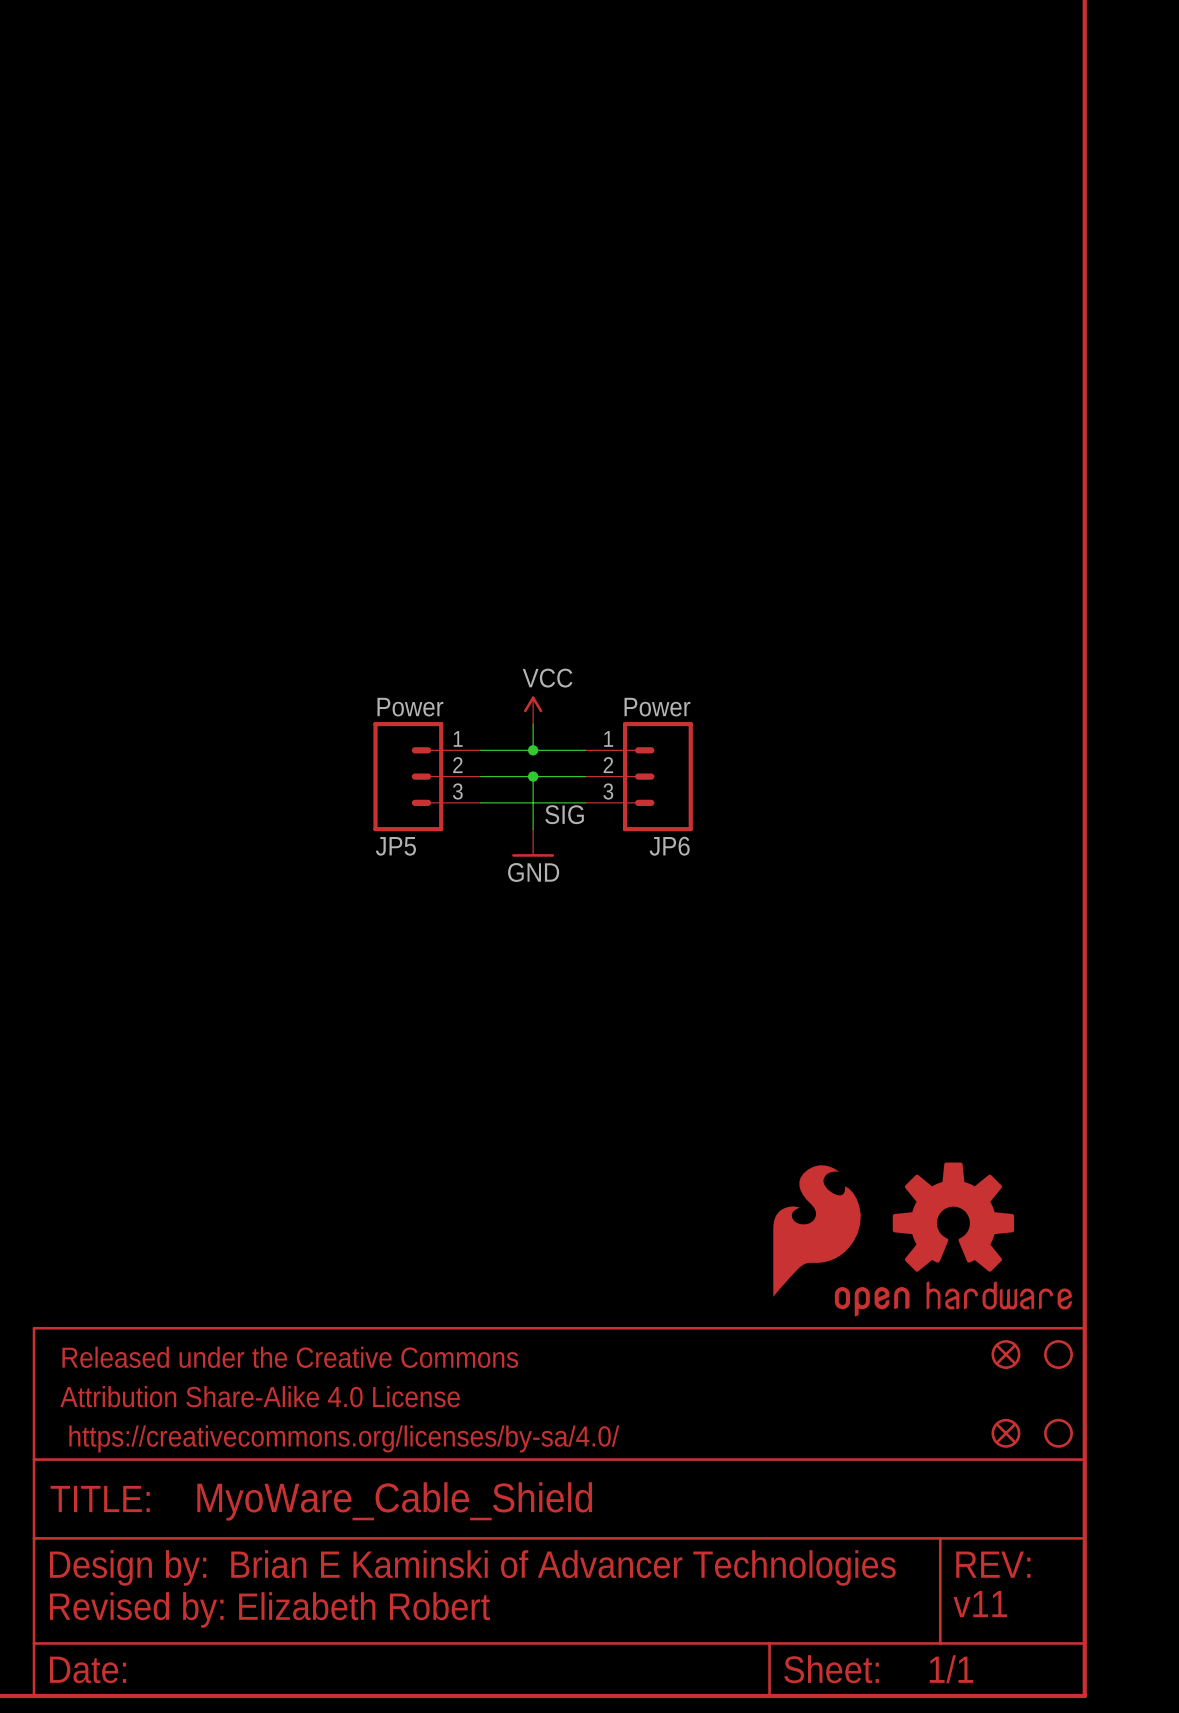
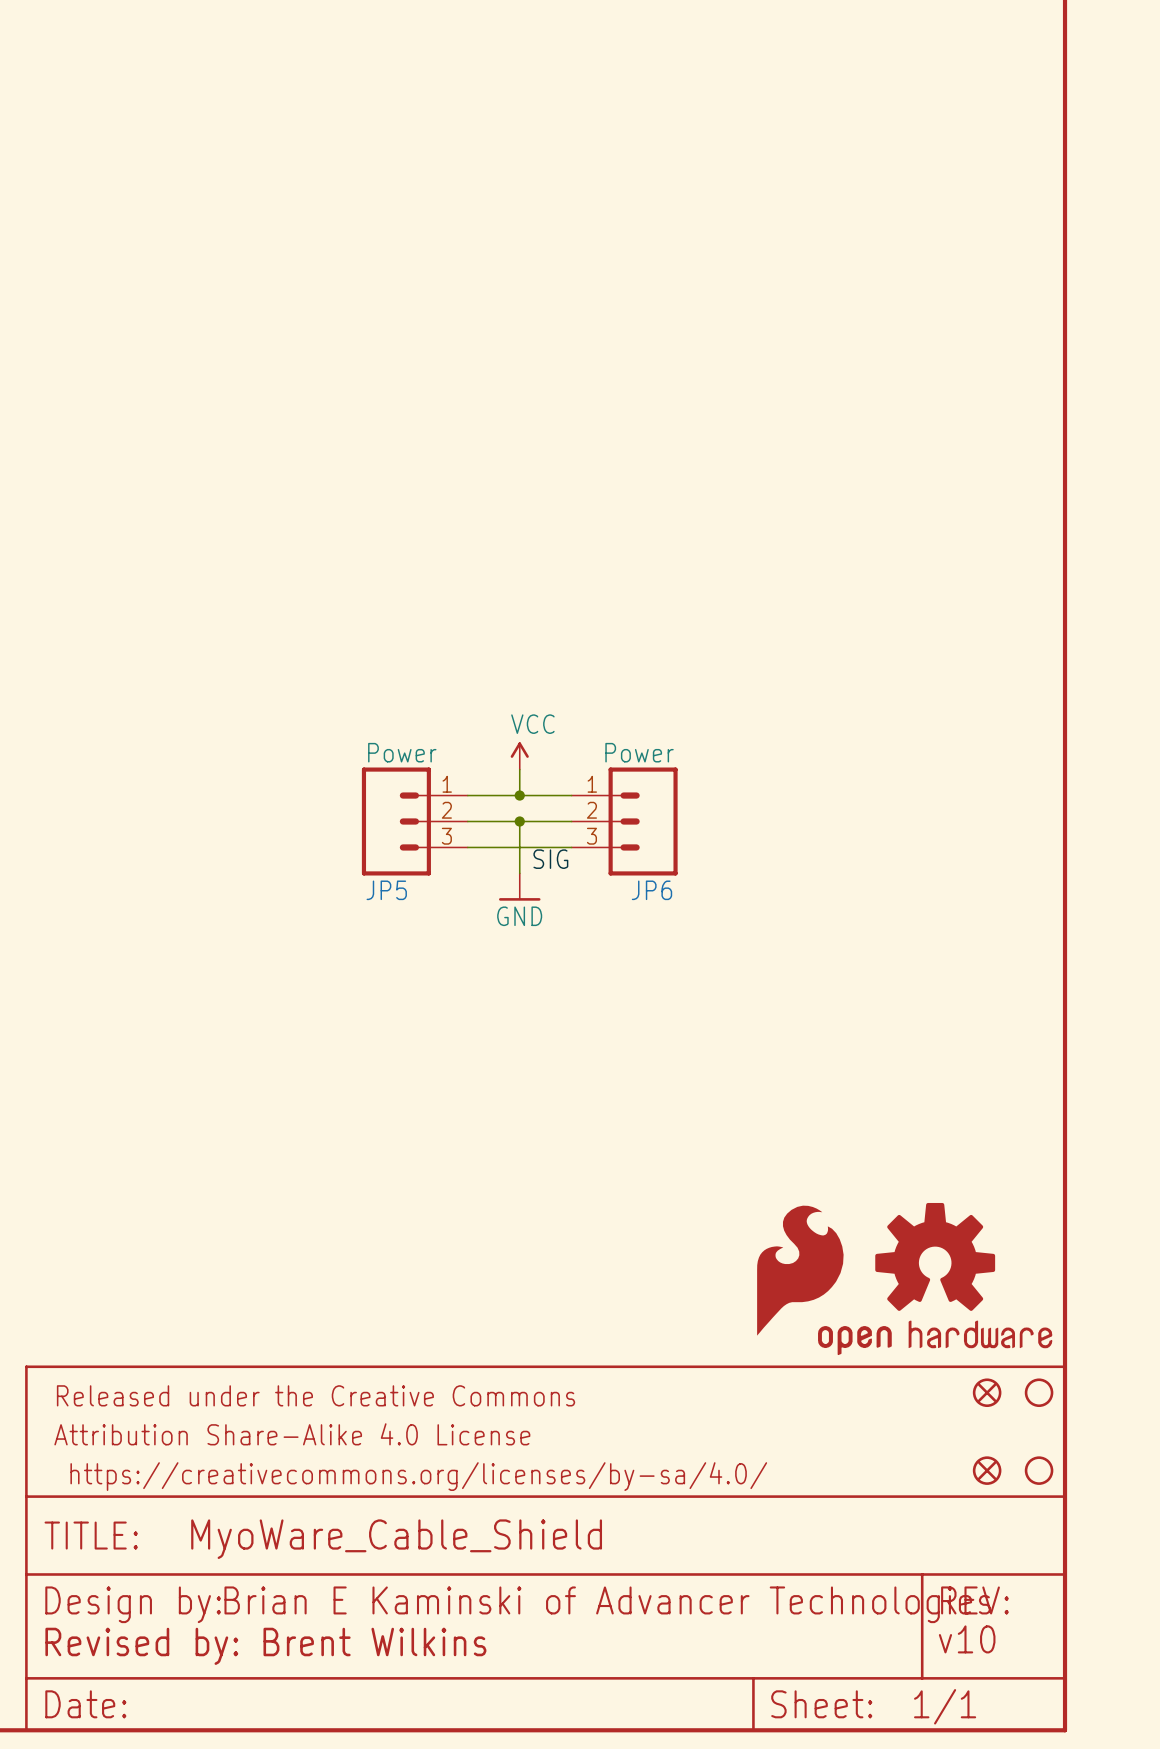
text: v11 (980, 1604) -> v10 (967, 1639)
text: Revised by: Elizabeth Robert (270, 1609) -> Revised by: Brent Wilkins (265, 1646)

